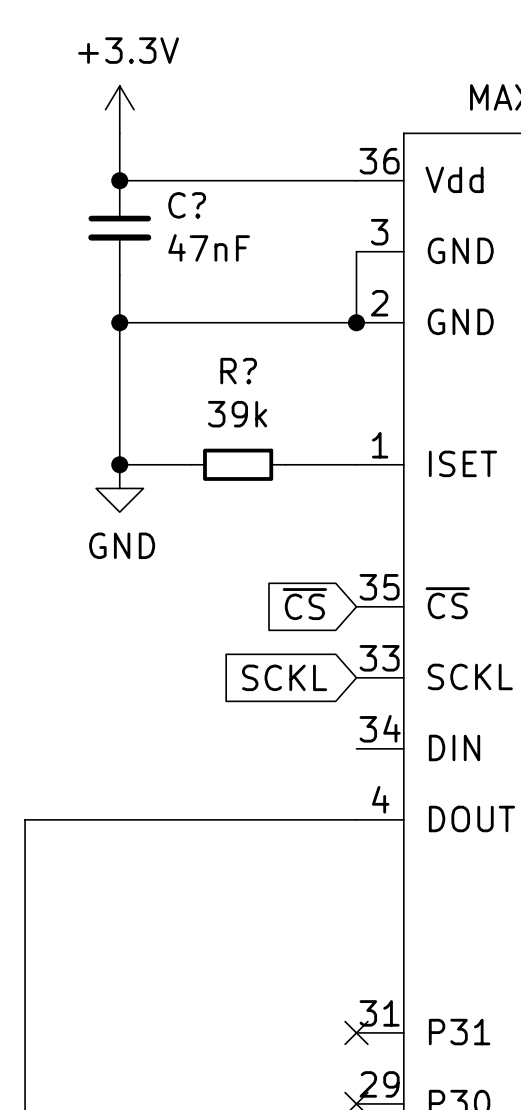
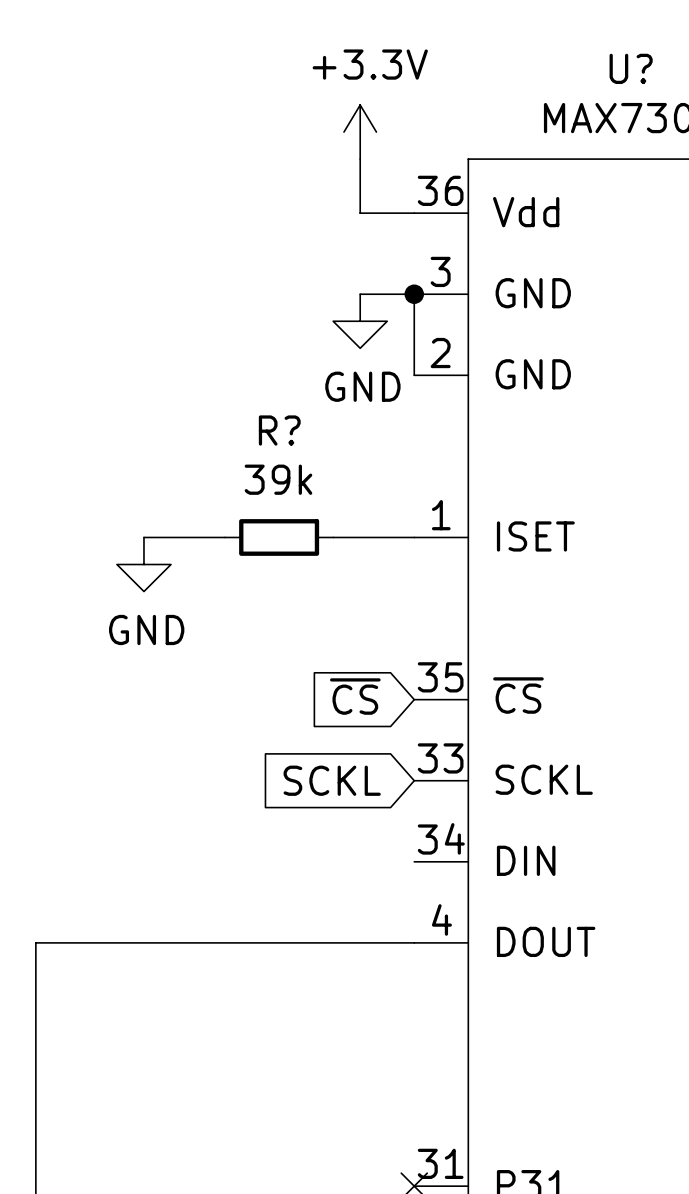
power symbol position: +3.3V (119, 109) -> +3.3V (360, 132)
wire: (119, 133) (119, 180) (309, 180) -> (360, 159) (360, 213)
junction: (119, 180) -> none
C?: 47nF (119, 228) -> none
wire: none -> (360, 294) (414, 294)
wire: (119, 275) (119, 464) -> none
power symbol: none -> GND (360, 321)
wire: (119, 322) (356, 322) -> none
junction: (119, 322) -> none
junction position: (356, 322) -> (414, 294)
junction: (119, 464) -> none

